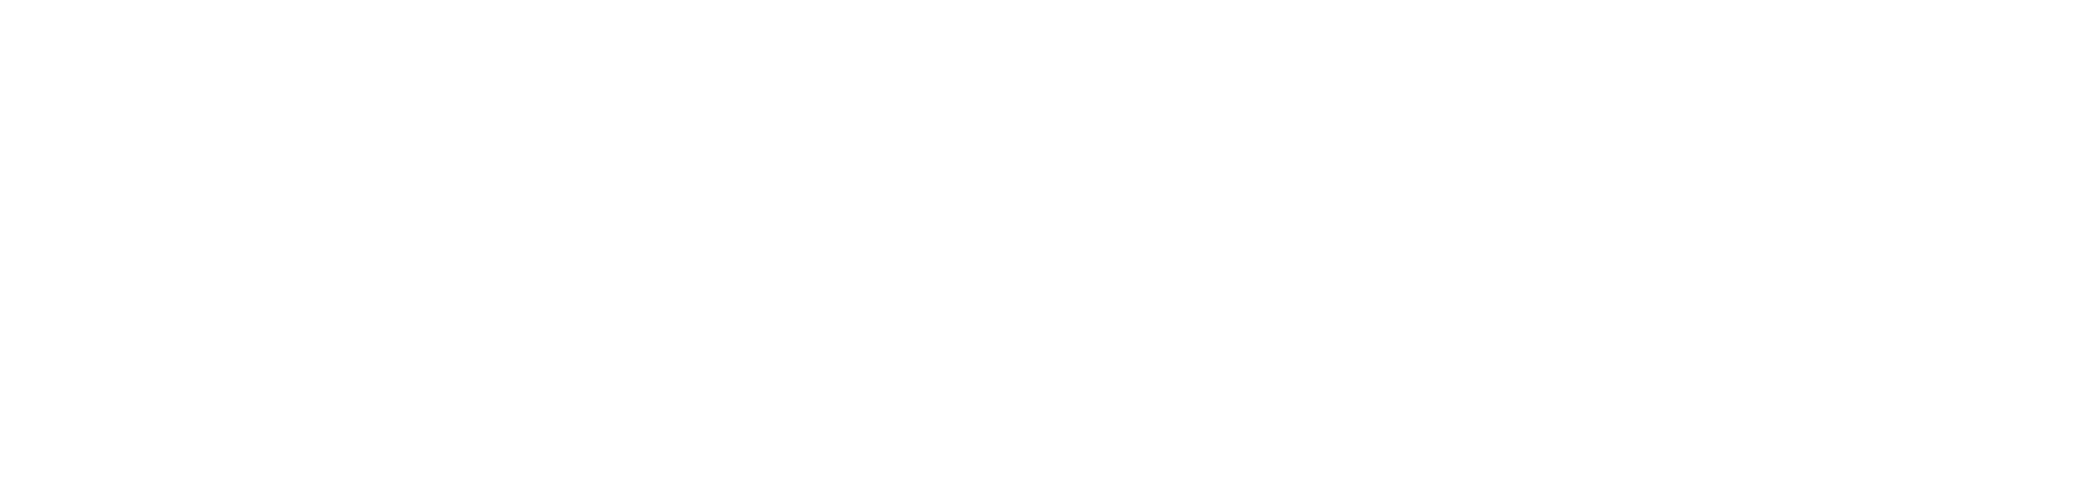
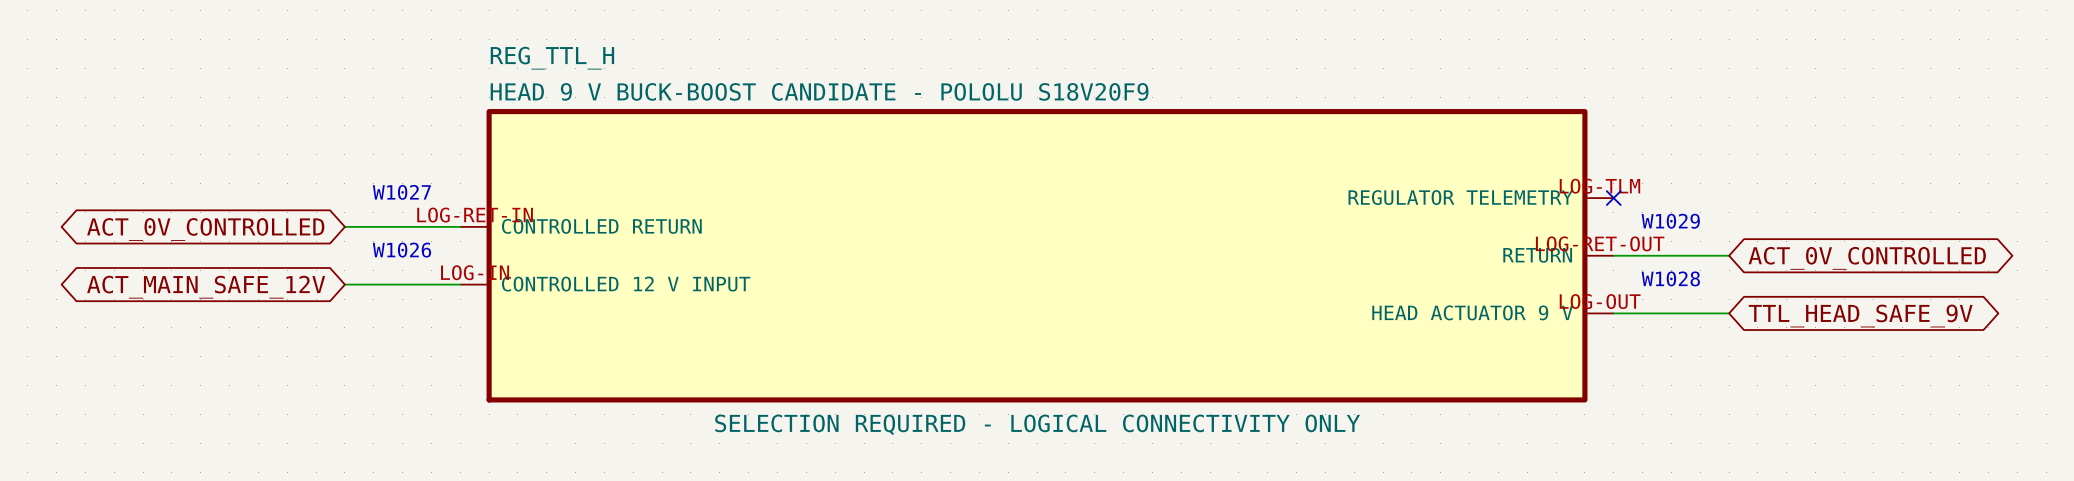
text: none -> W1027 (401, 192)
no-connect mark: none -> (1613, 198)
text: none -> W1029 (1670, 221)
wire: none -> (344, 226) (460, 226)
global label: none -> ACT_0V_CONTROLLED (205, 229)
text: none -> W1026 (401, 250)
REG_TTL_H: none -> (1037, 255)
wire: none -> (1613, 255) (1729, 255)
global label: none -> ACT_0V_CONTROLLED (1867, 258)
text: none -> W1028 (1670, 278)
wire: none -> (344, 284) (460, 284)
global label: none -> ACT_MAIN_SAFE_12V (206, 287)
wire: none -> (1613, 313) (1729, 313)
global label: none -> TTL_HEAD_SAFE_9V (1860, 316)

